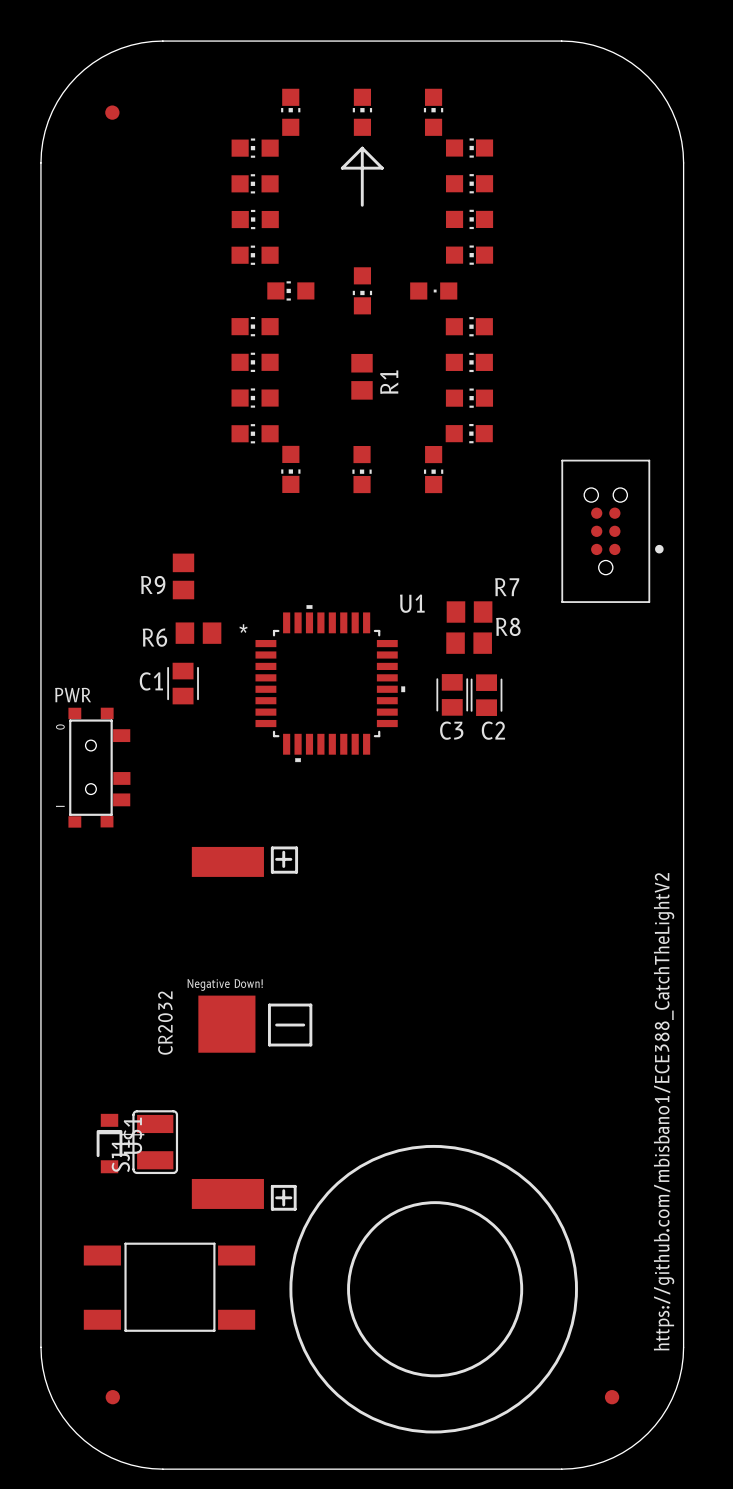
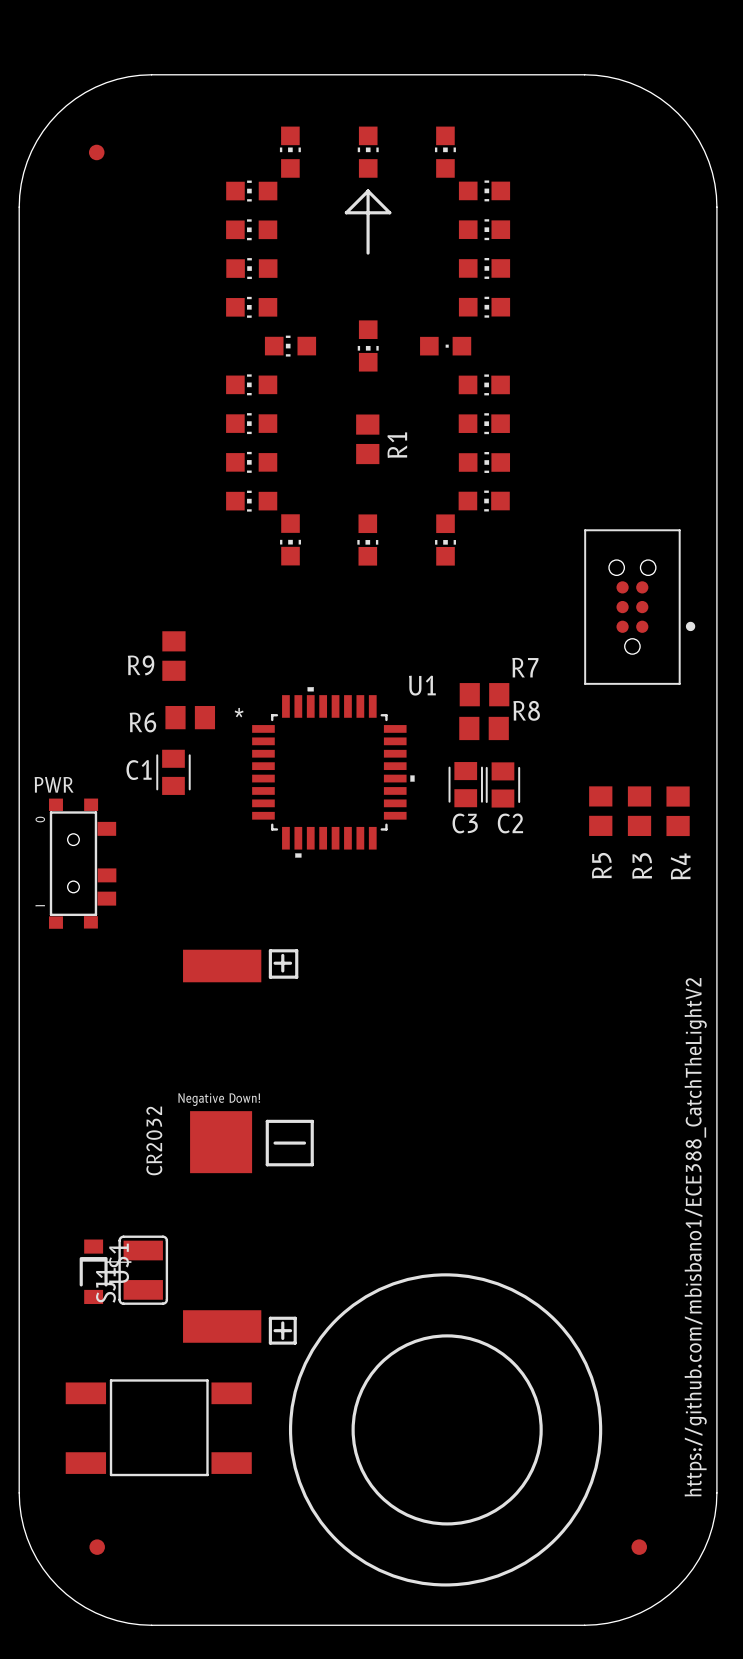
R5: none -> (600, 811)
R3: none -> (639, 811)
R4: none -> (678, 811)

